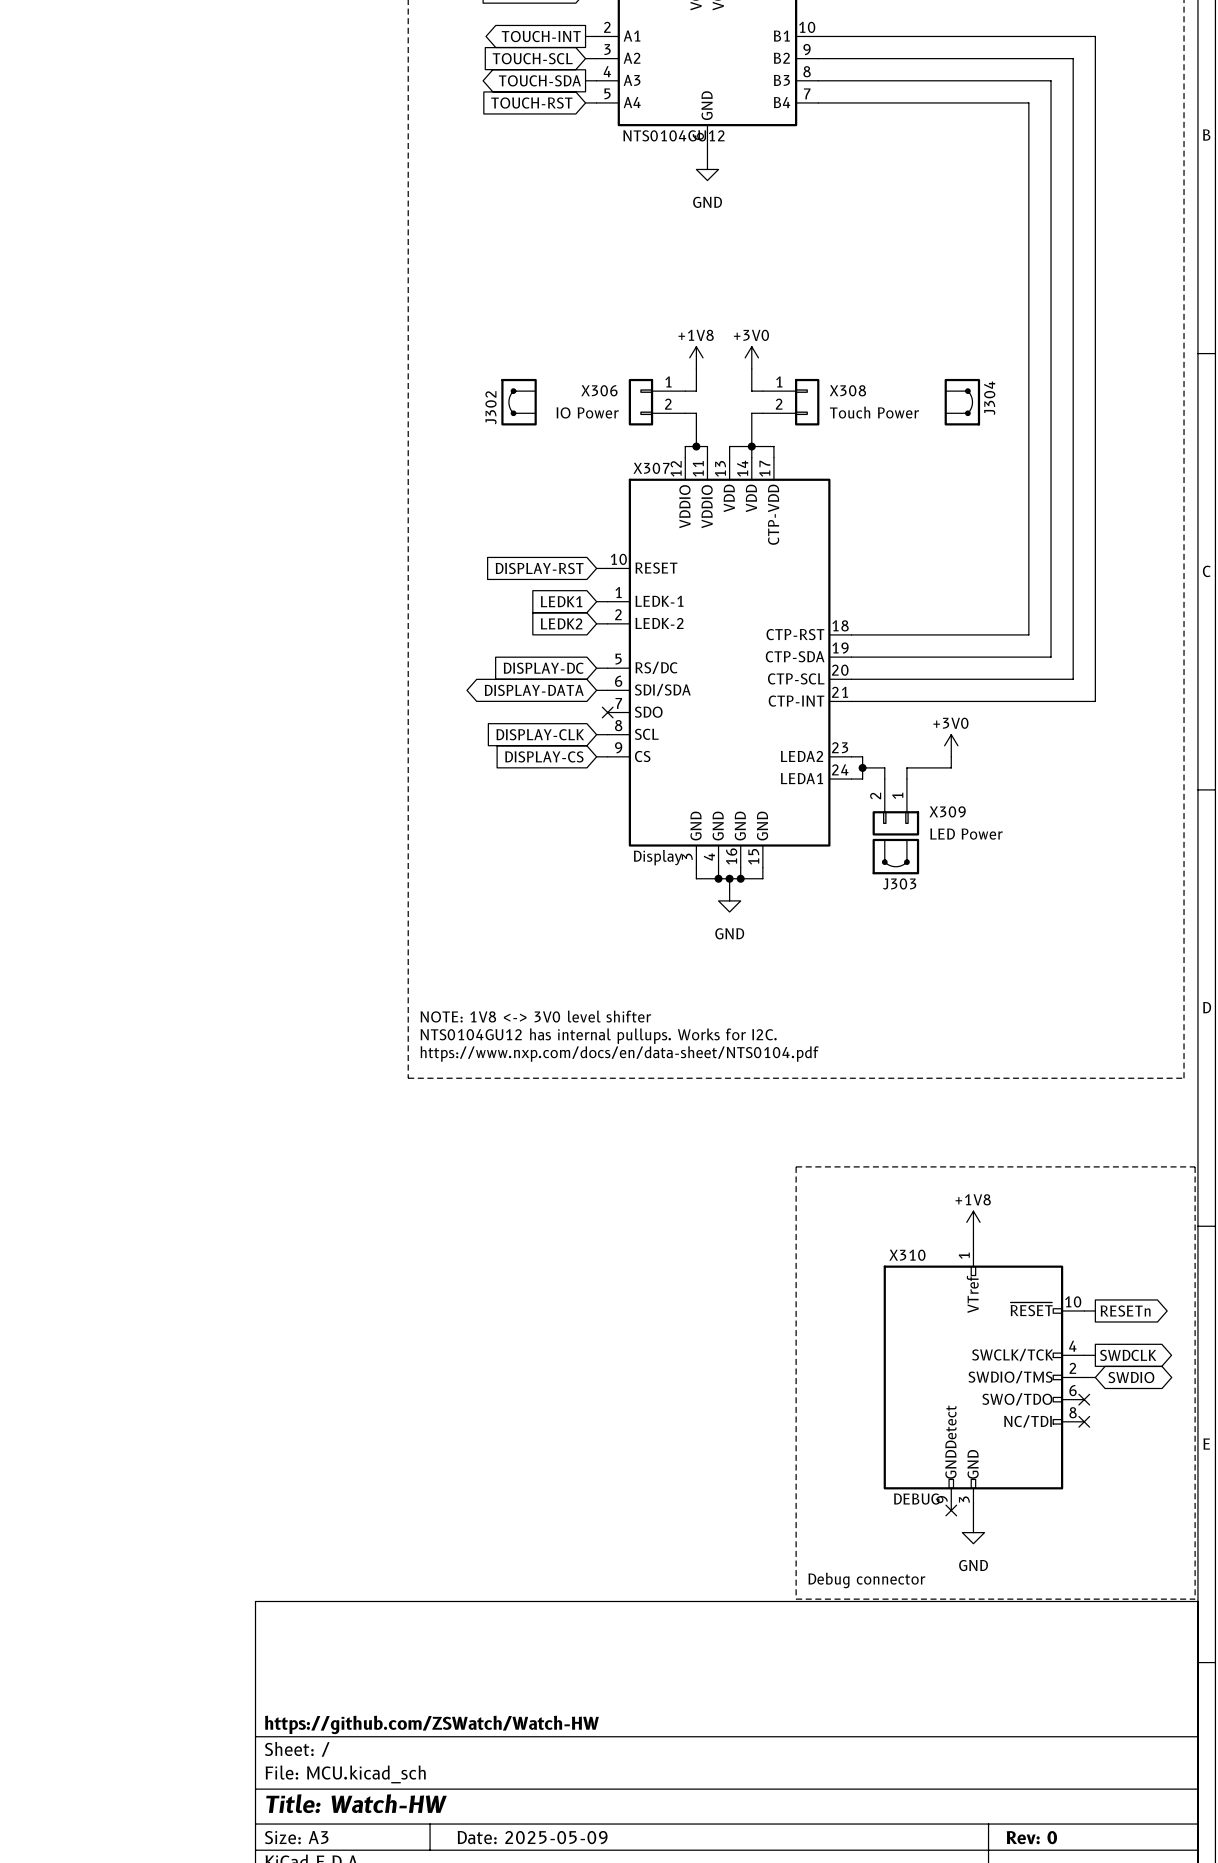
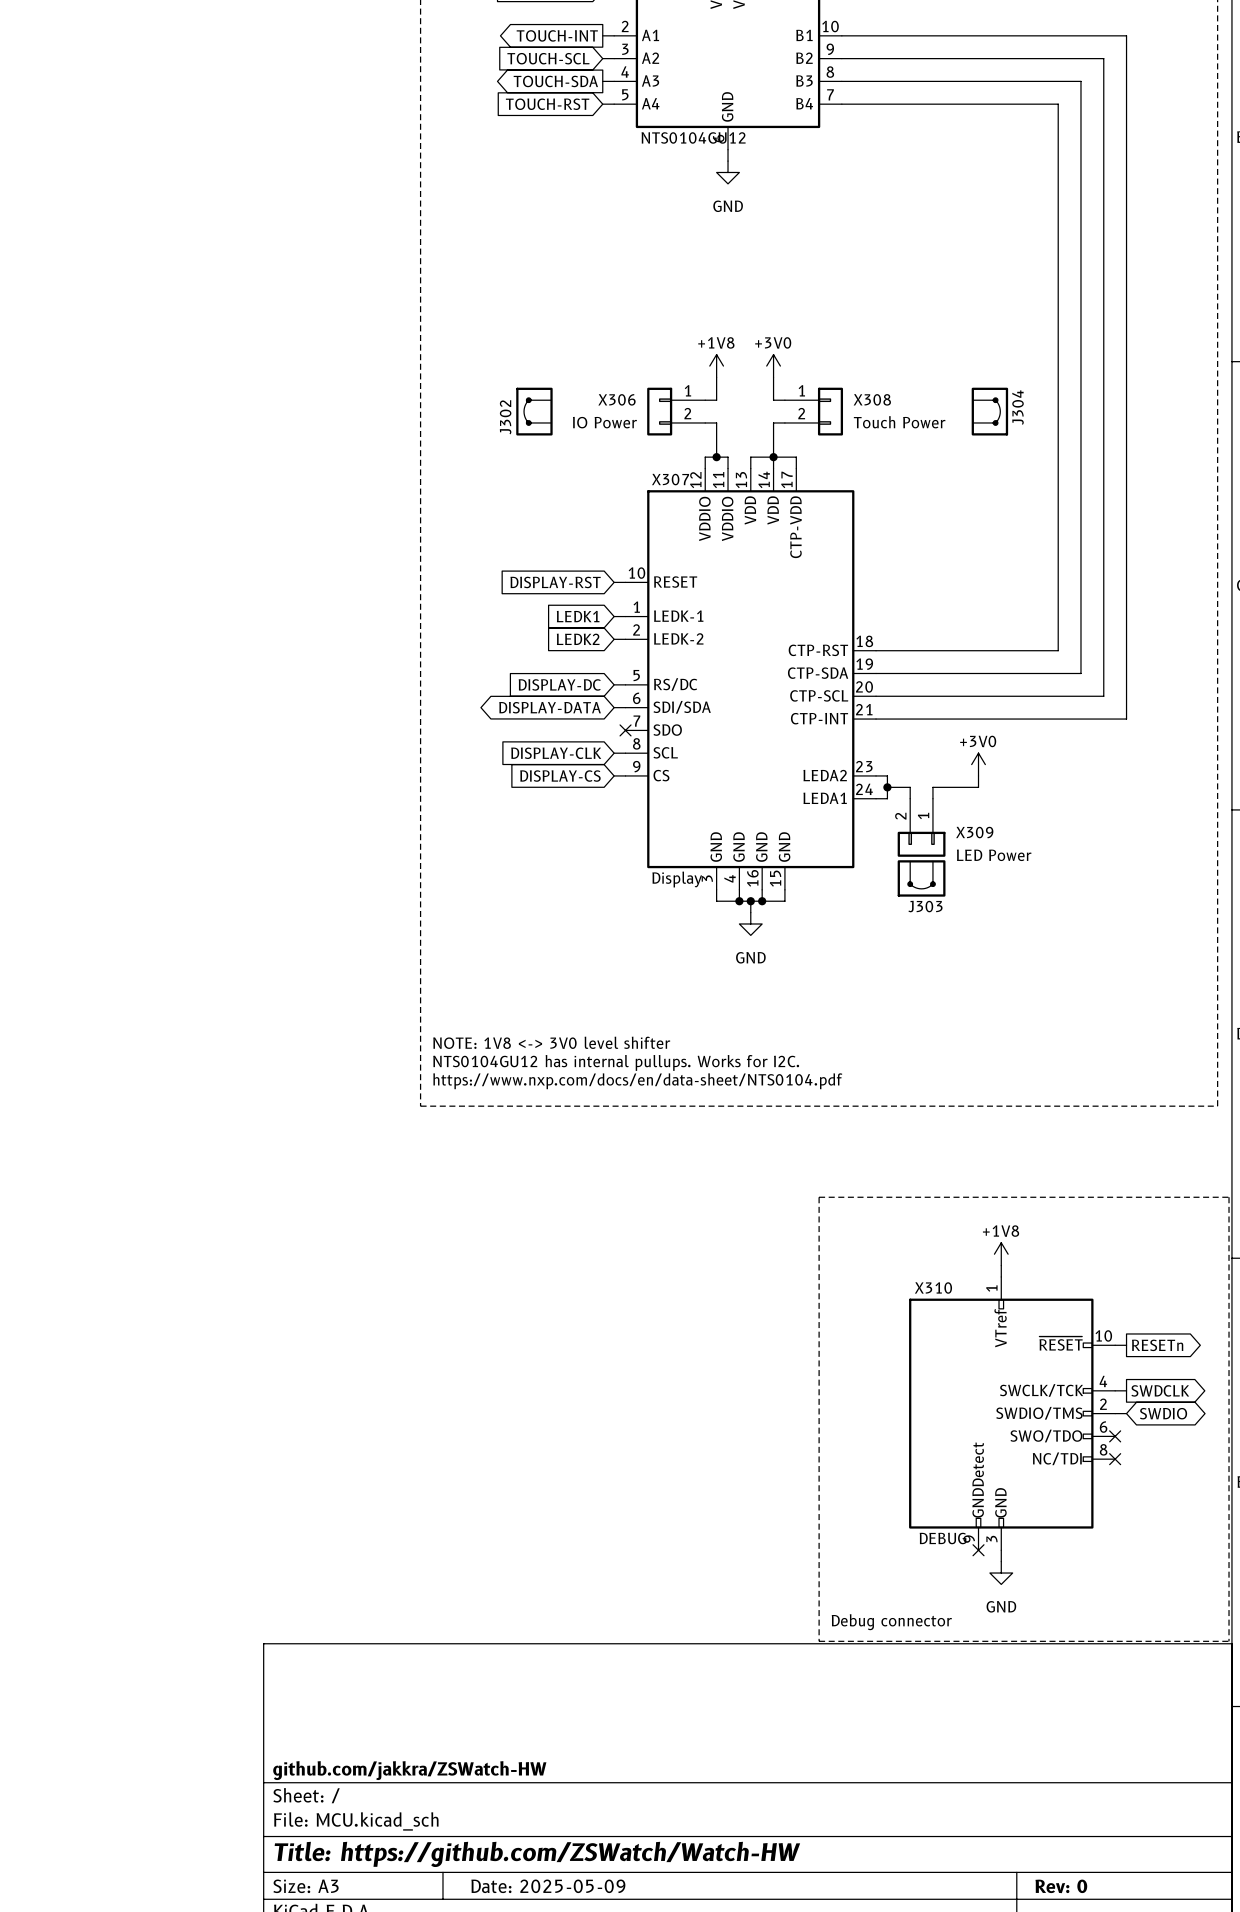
title block: https://github.com/ZSWatch/Watch-HW (431, 1724) -> github.com/jakkra/ZSWatch-HW (409, 1770)
title block: Title: Watch-HW (356, 1803) -> Title: https://github.com/ZSWatch/Watch-HW (537, 1854)

